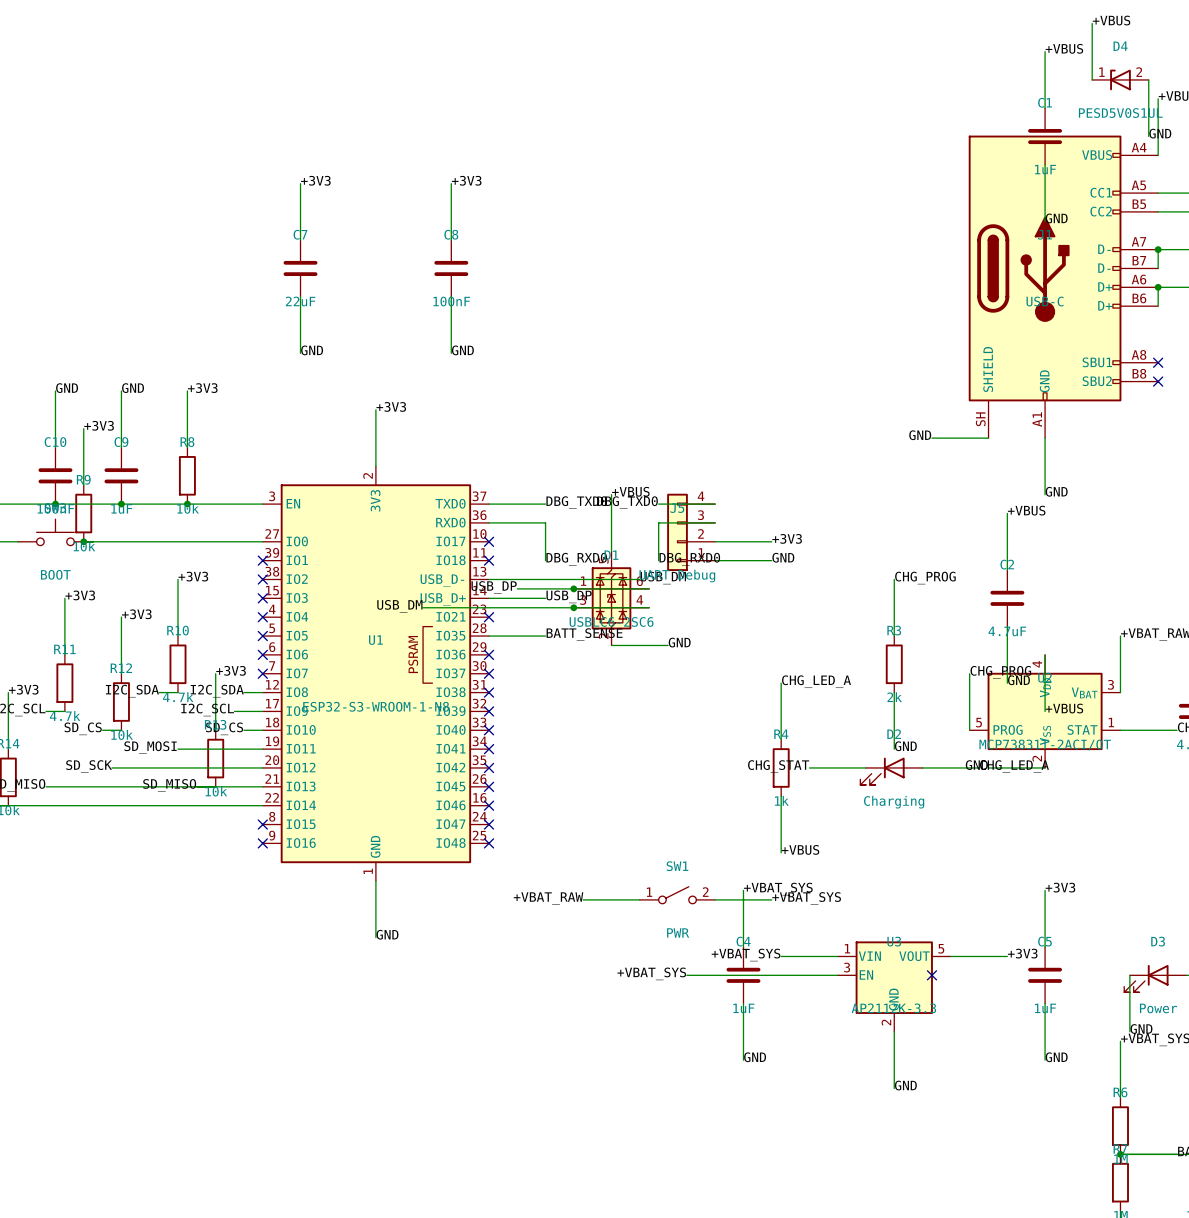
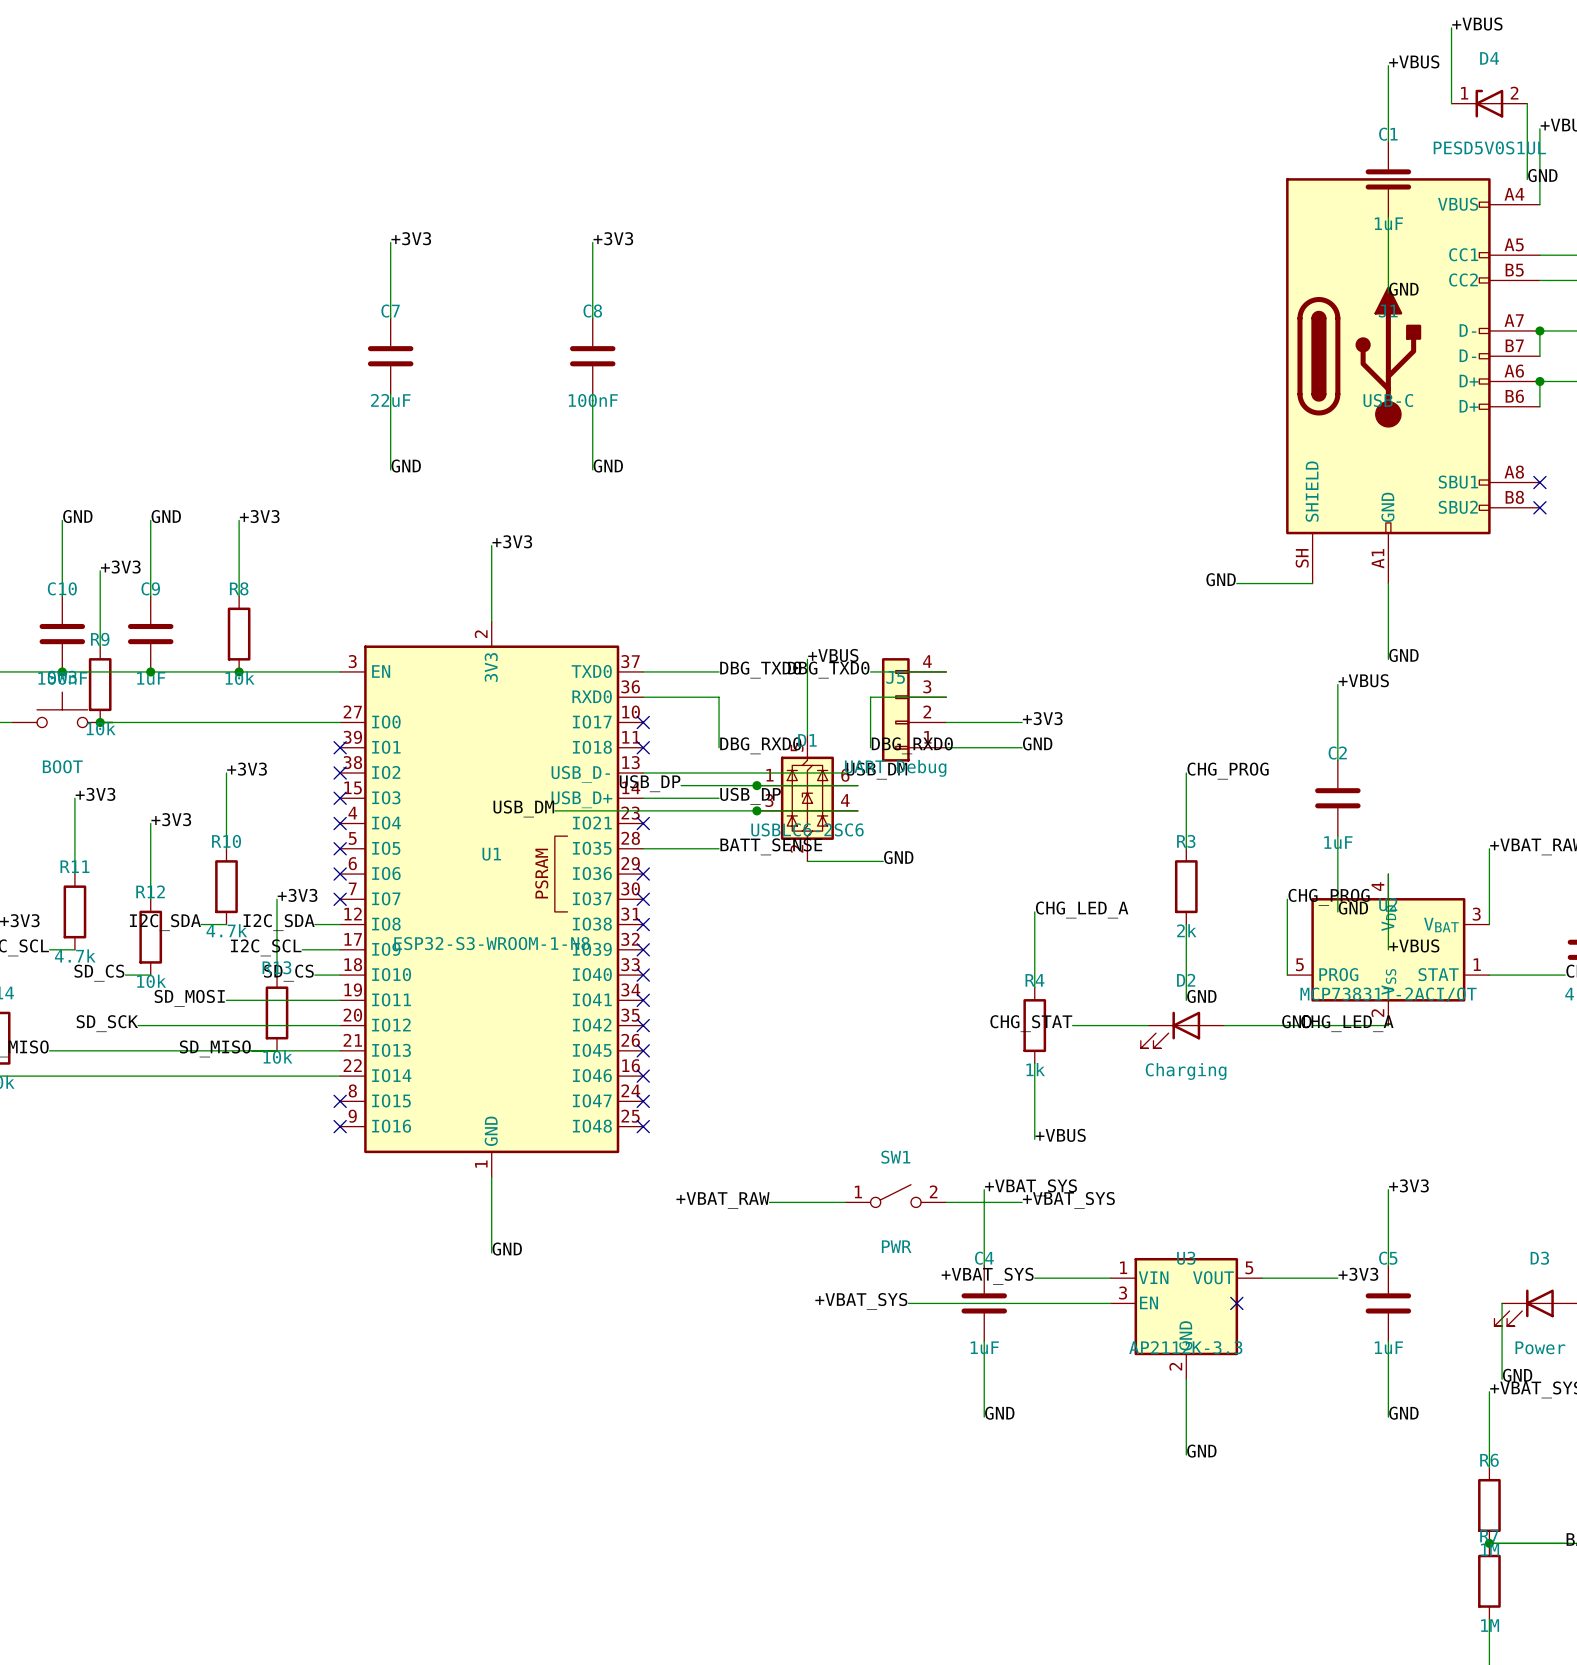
C2 value: 4.7uF (1007, 631) -> 1uF (1338, 842)

